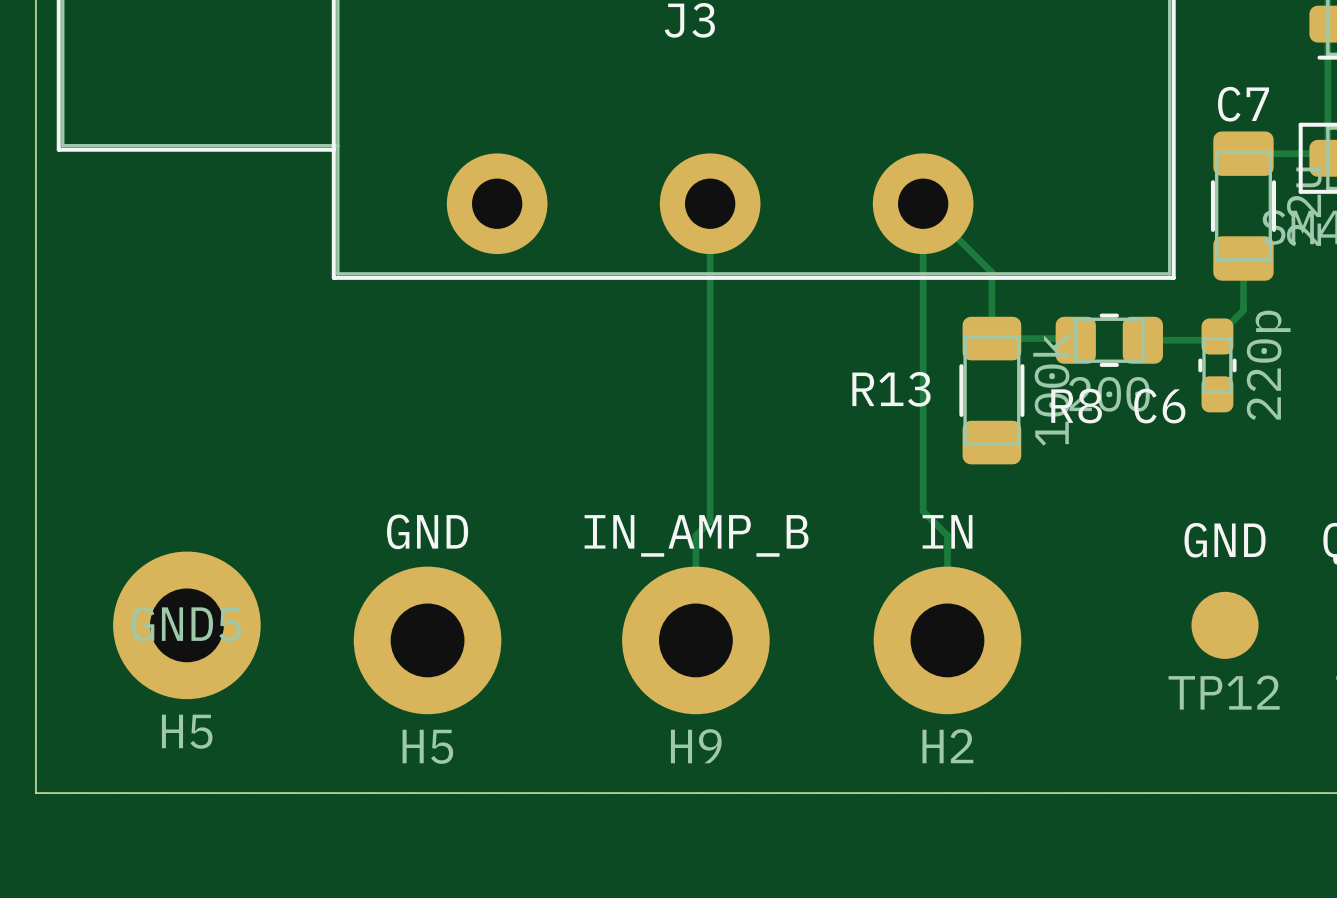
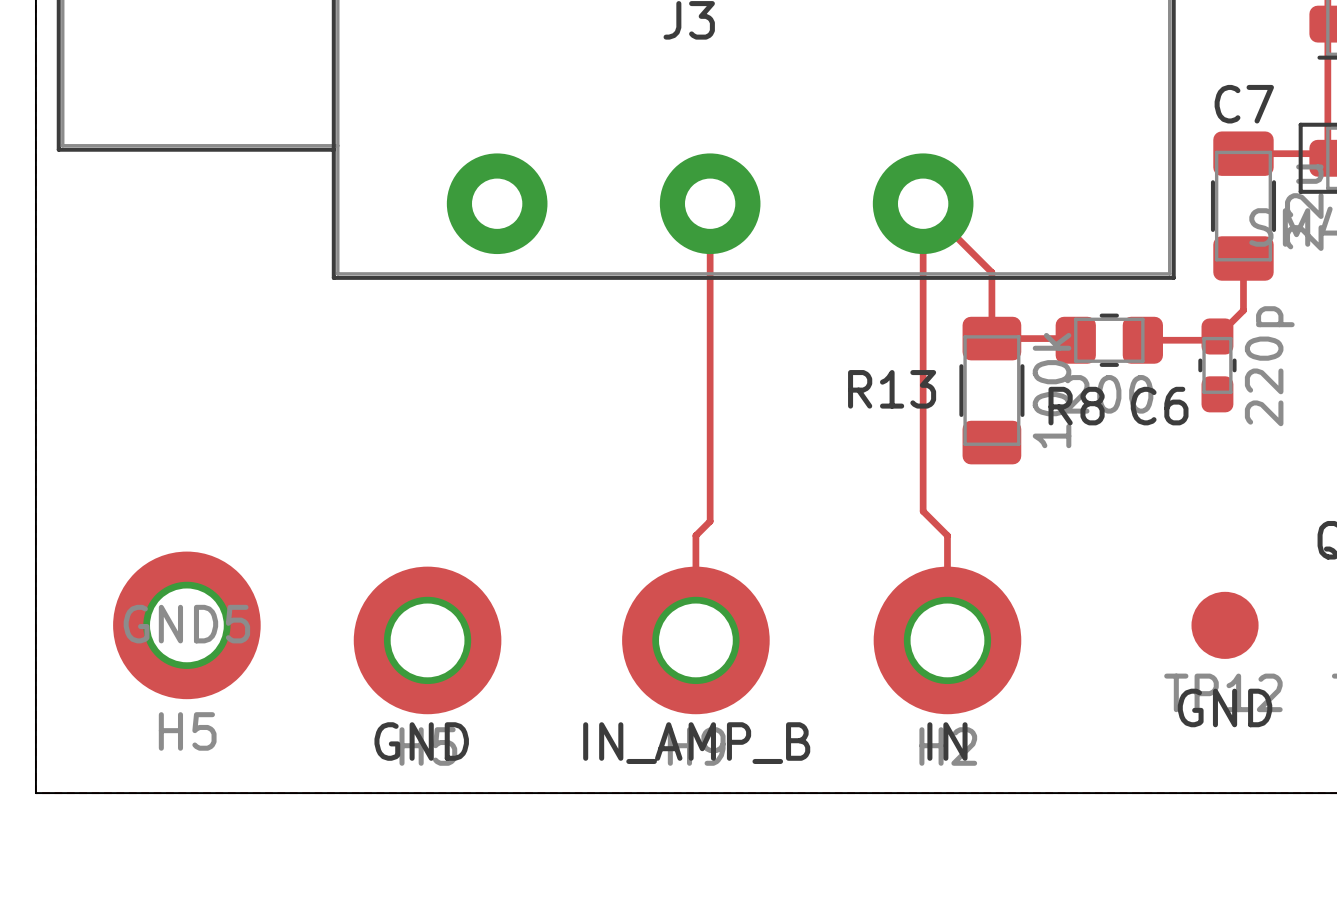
GND name position: GND (427, 531) -> GND (421, 741)
IN name position: IN (947, 531) -> IN (947, 741)
IN_AMP_B name position: IN_AMP_B (696, 535) -> IN_AMP_B (696, 743)
GND name position: GND (1225, 540) -> GND (1225, 707)

